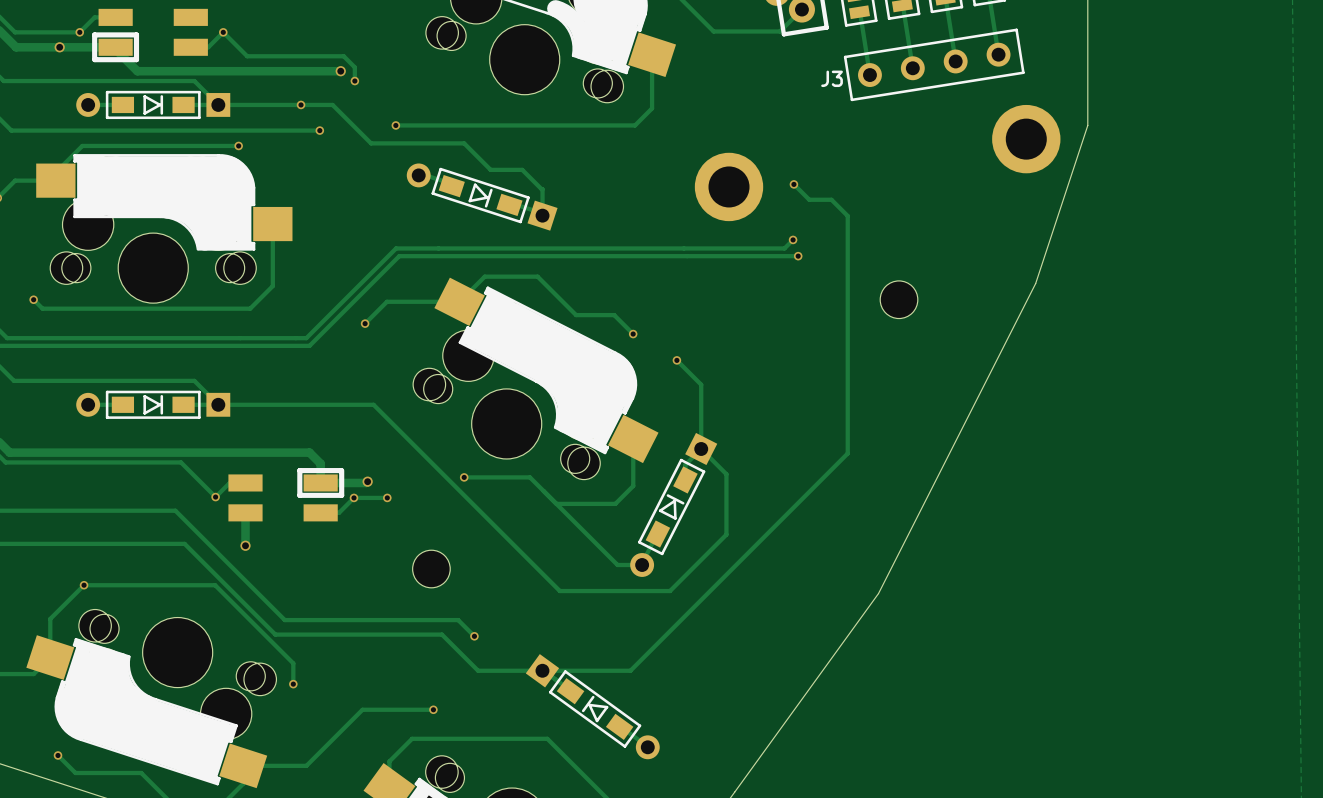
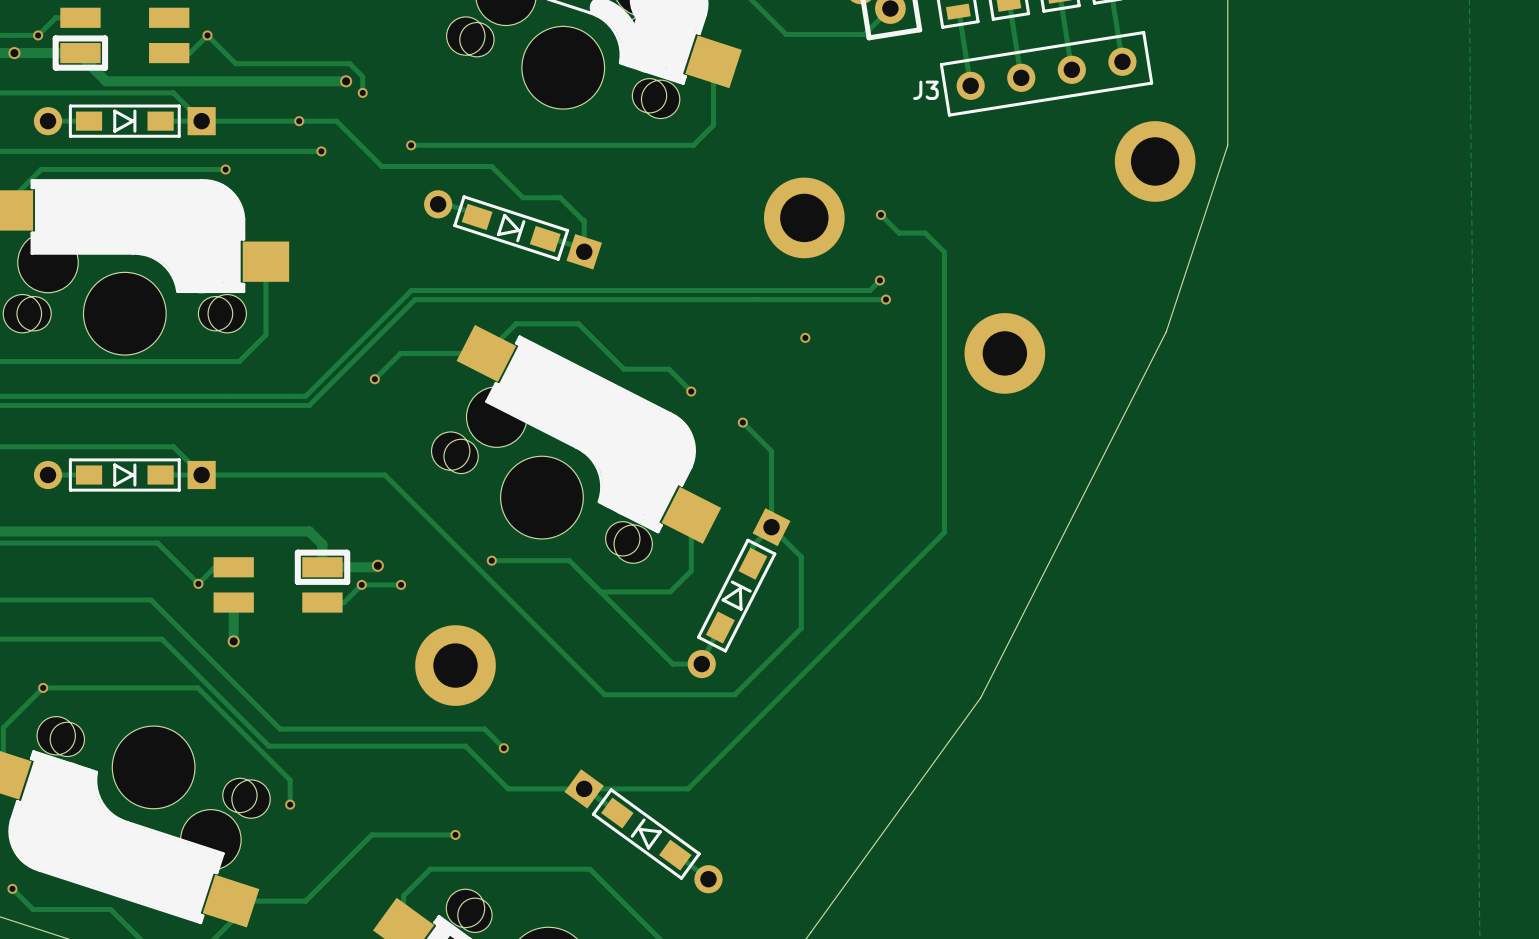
part footprint: [880, 280, 918, 319] -> [964, 313, 1046, 394]
via: none -> (805, 337)
part footprint: [412, 550, 451, 588] -> [415, 625, 496, 706]

